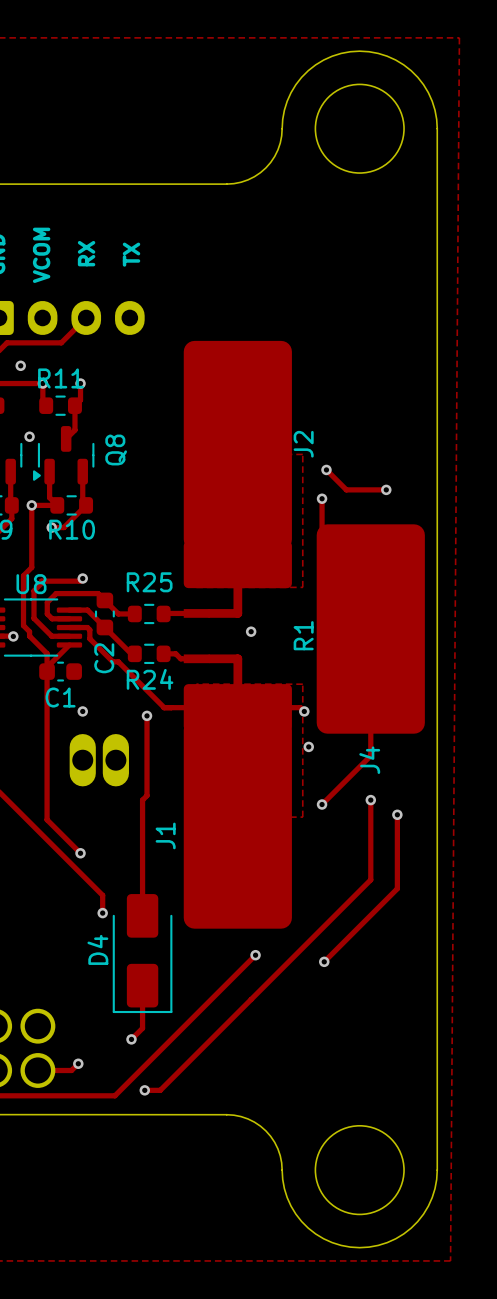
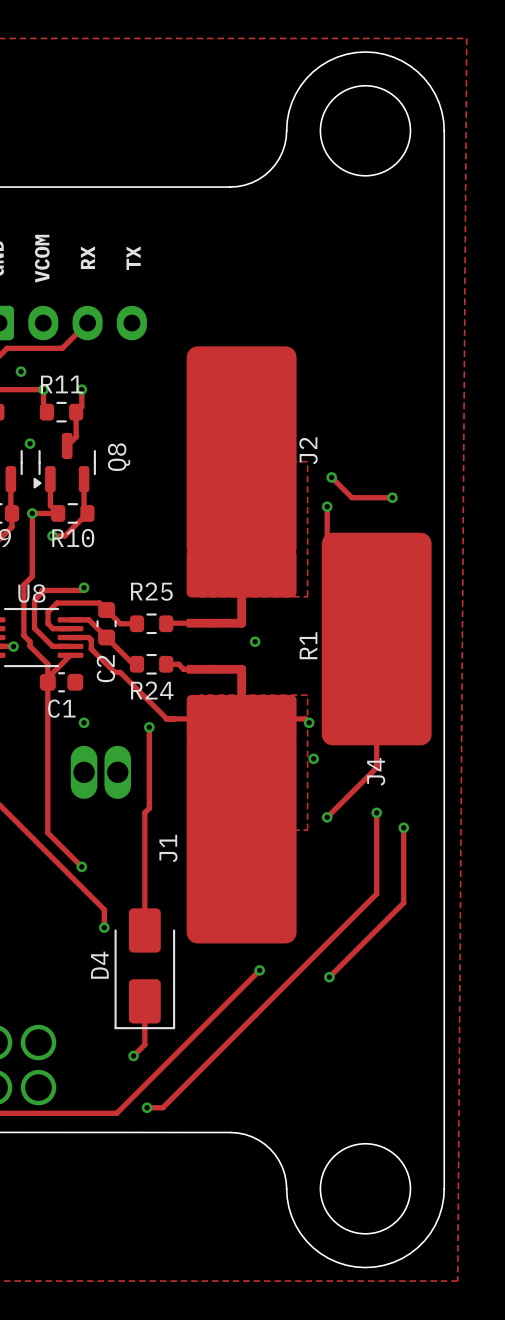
track: (78, 1063) (71, 1070) (37, 1070) -> none
via: (78, 1063) -> none

